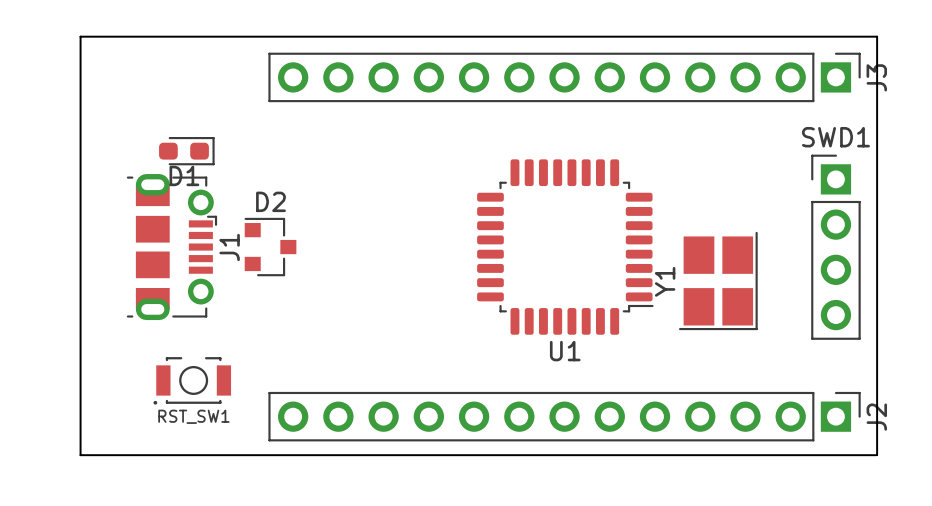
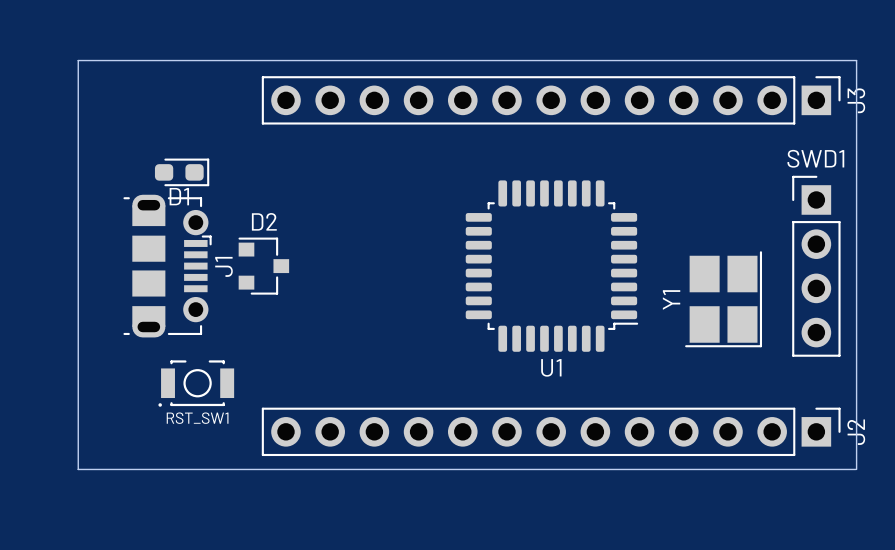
Y1 position: (718, 280) -> (723, 299)
RST_SW1 position: (192, 380) -> (196, 383)

